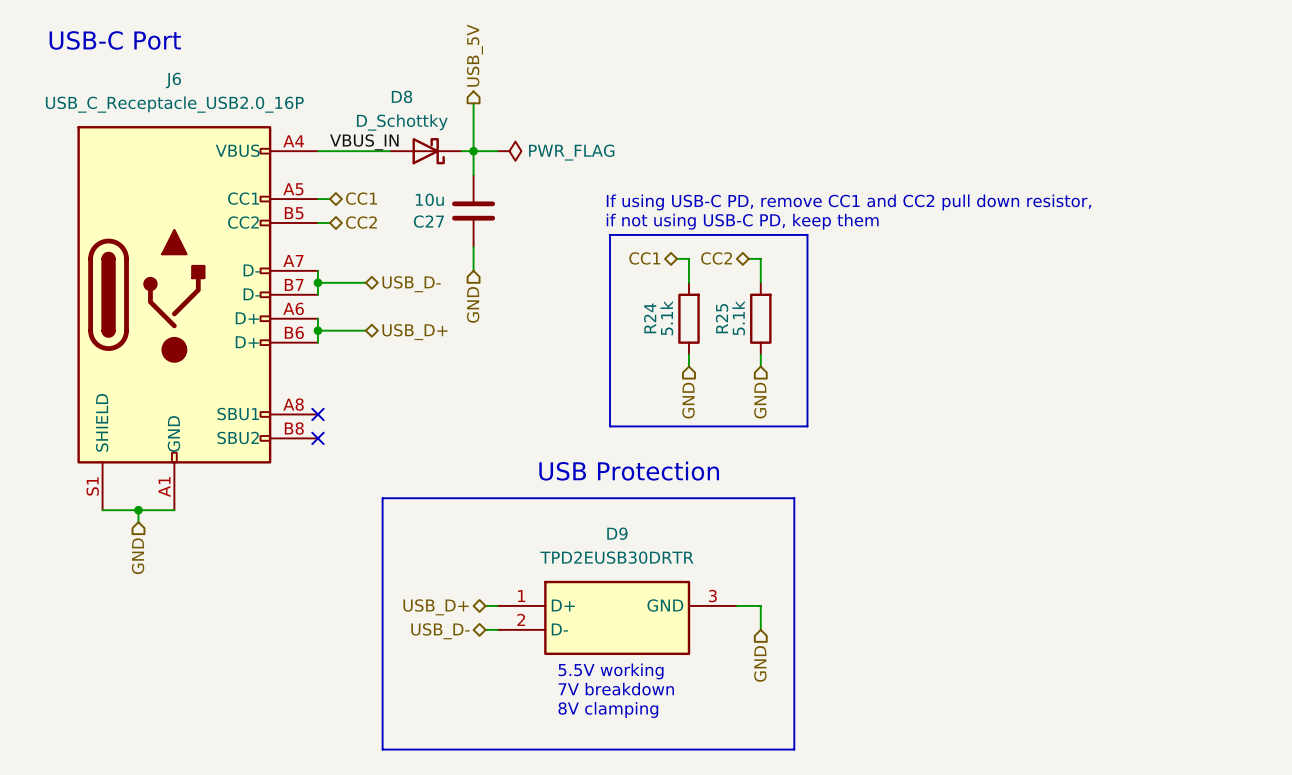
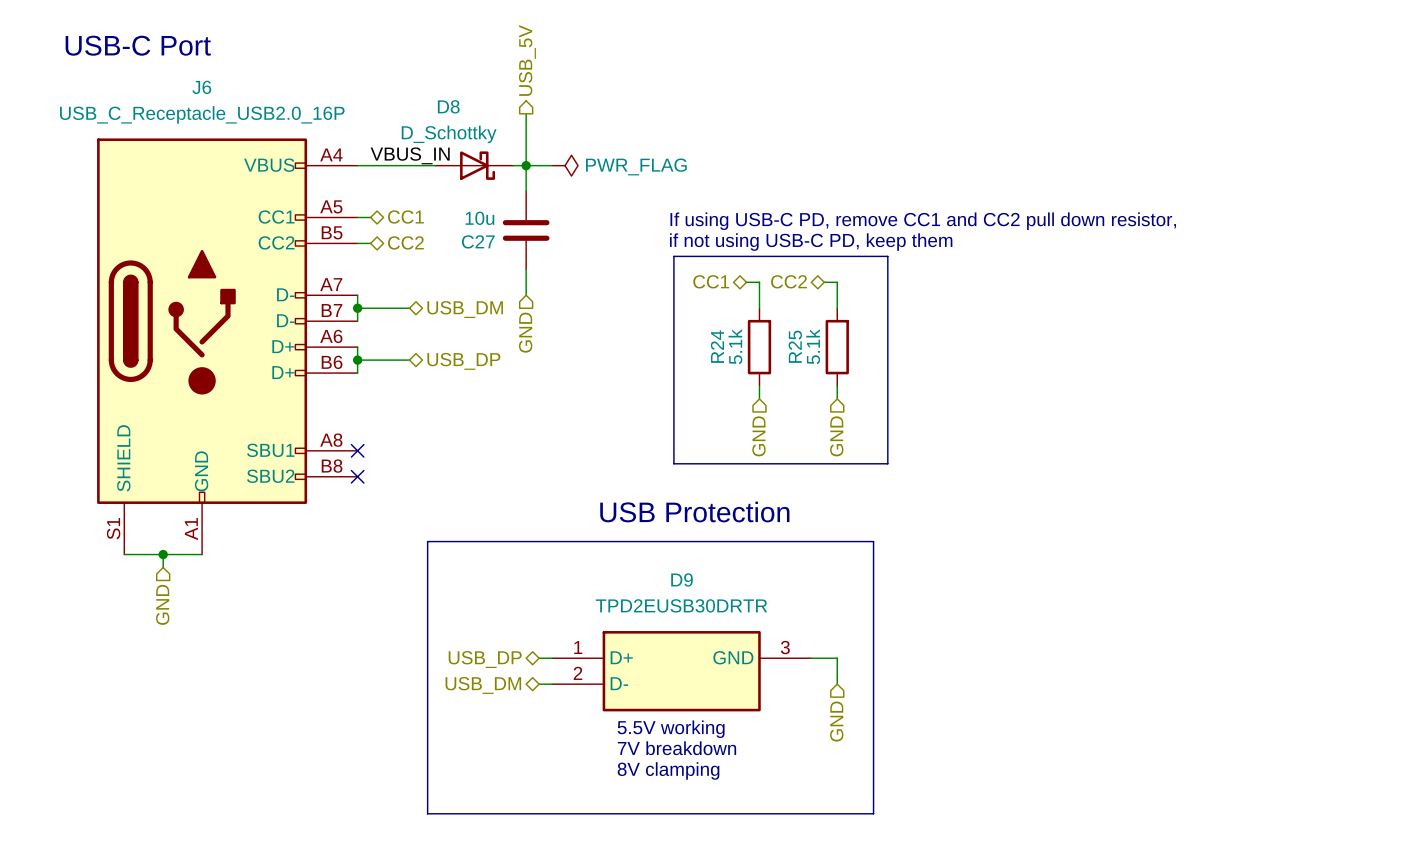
hierarchical label: USB_D- (411, 284) -> USB_DM (465, 309)
hierarchical label: USB_D+ (415, 332) -> USB_DP (463, 361)
hierarchical label: USB_D+ (436, 607) -> USB_DP (485, 659)
hierarchical label: USB_D- (440, 631) -> USB_DM (483, 685)

